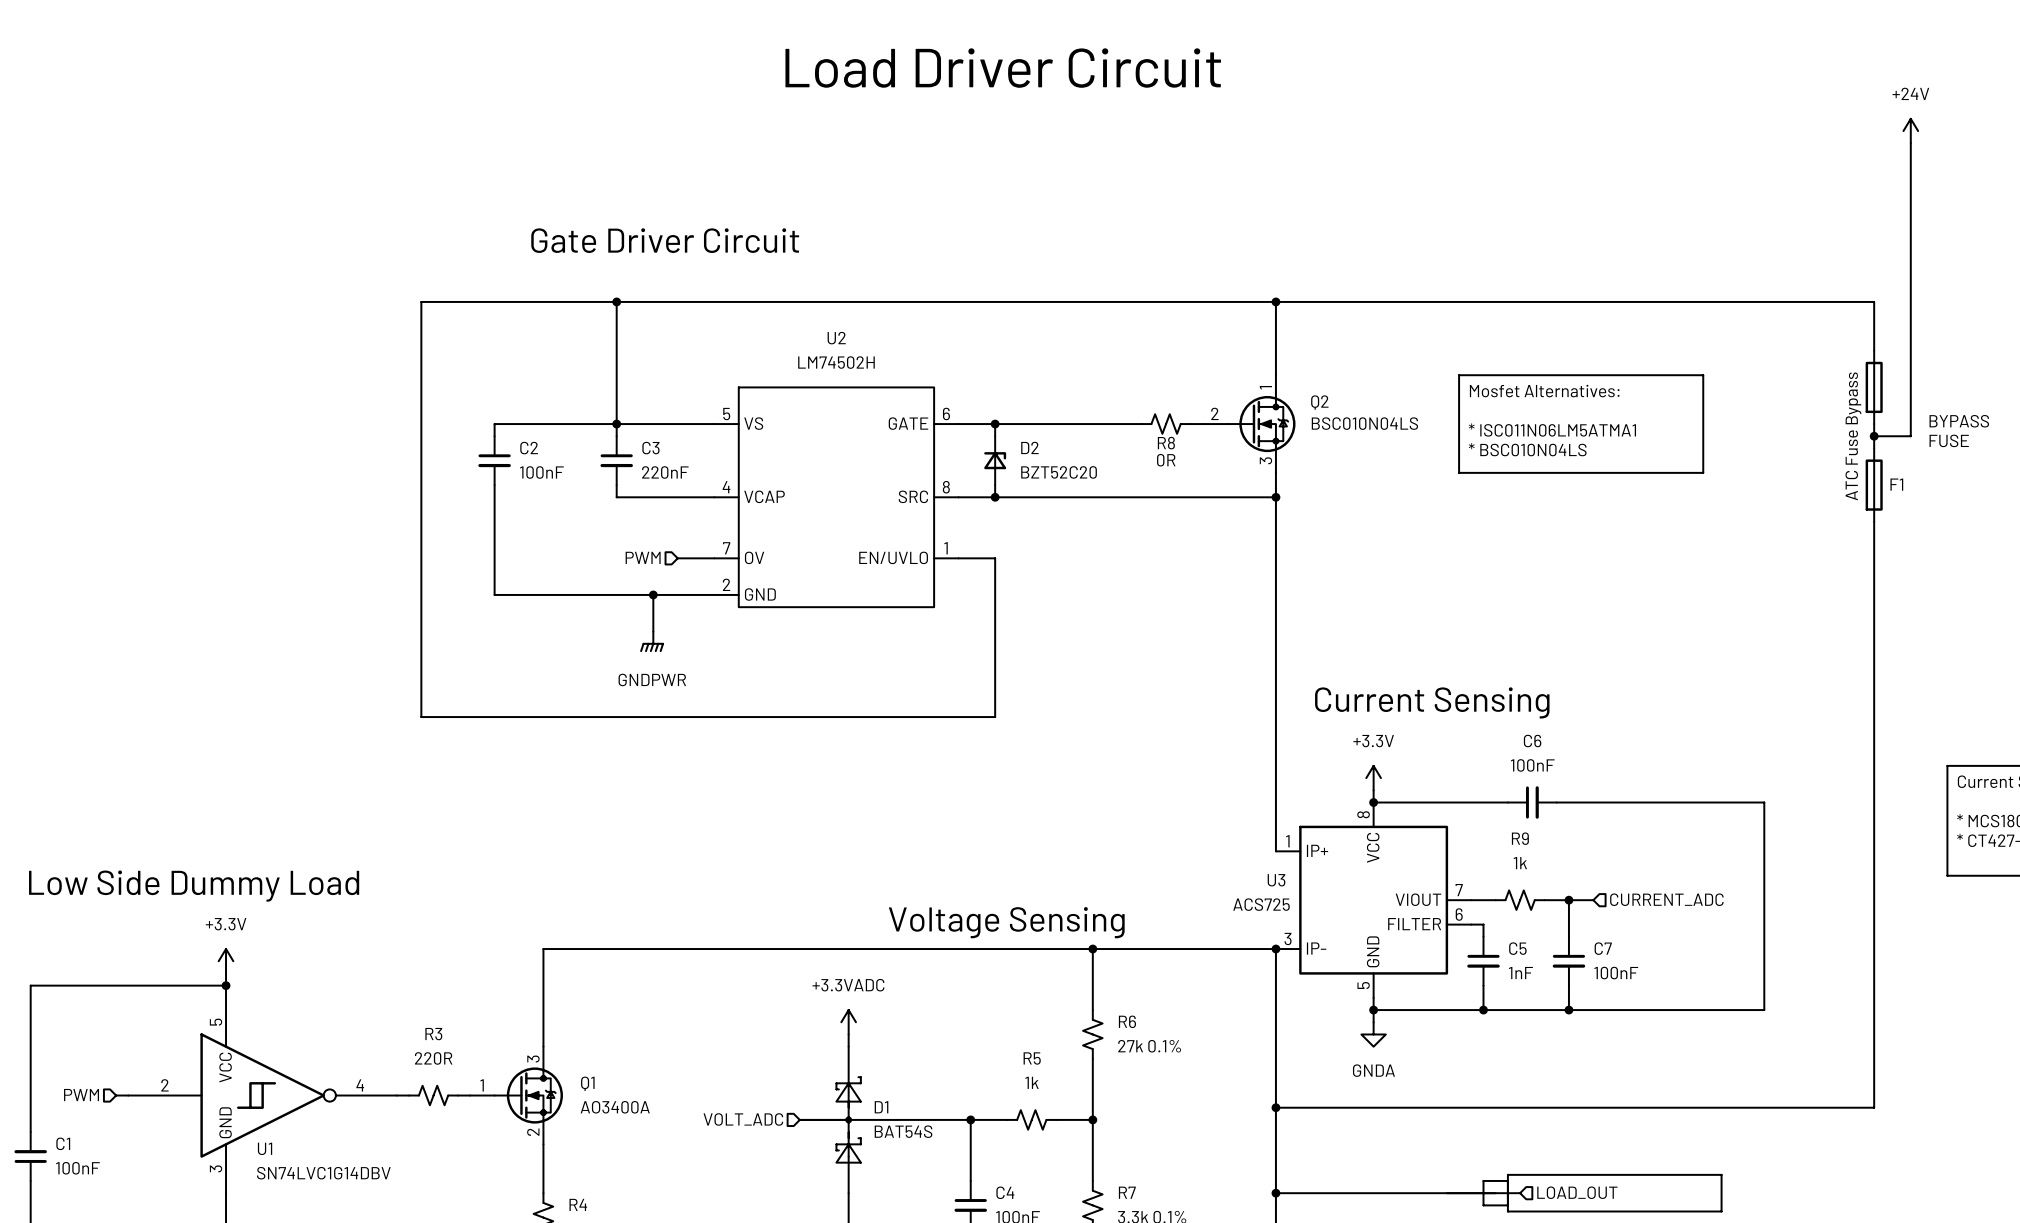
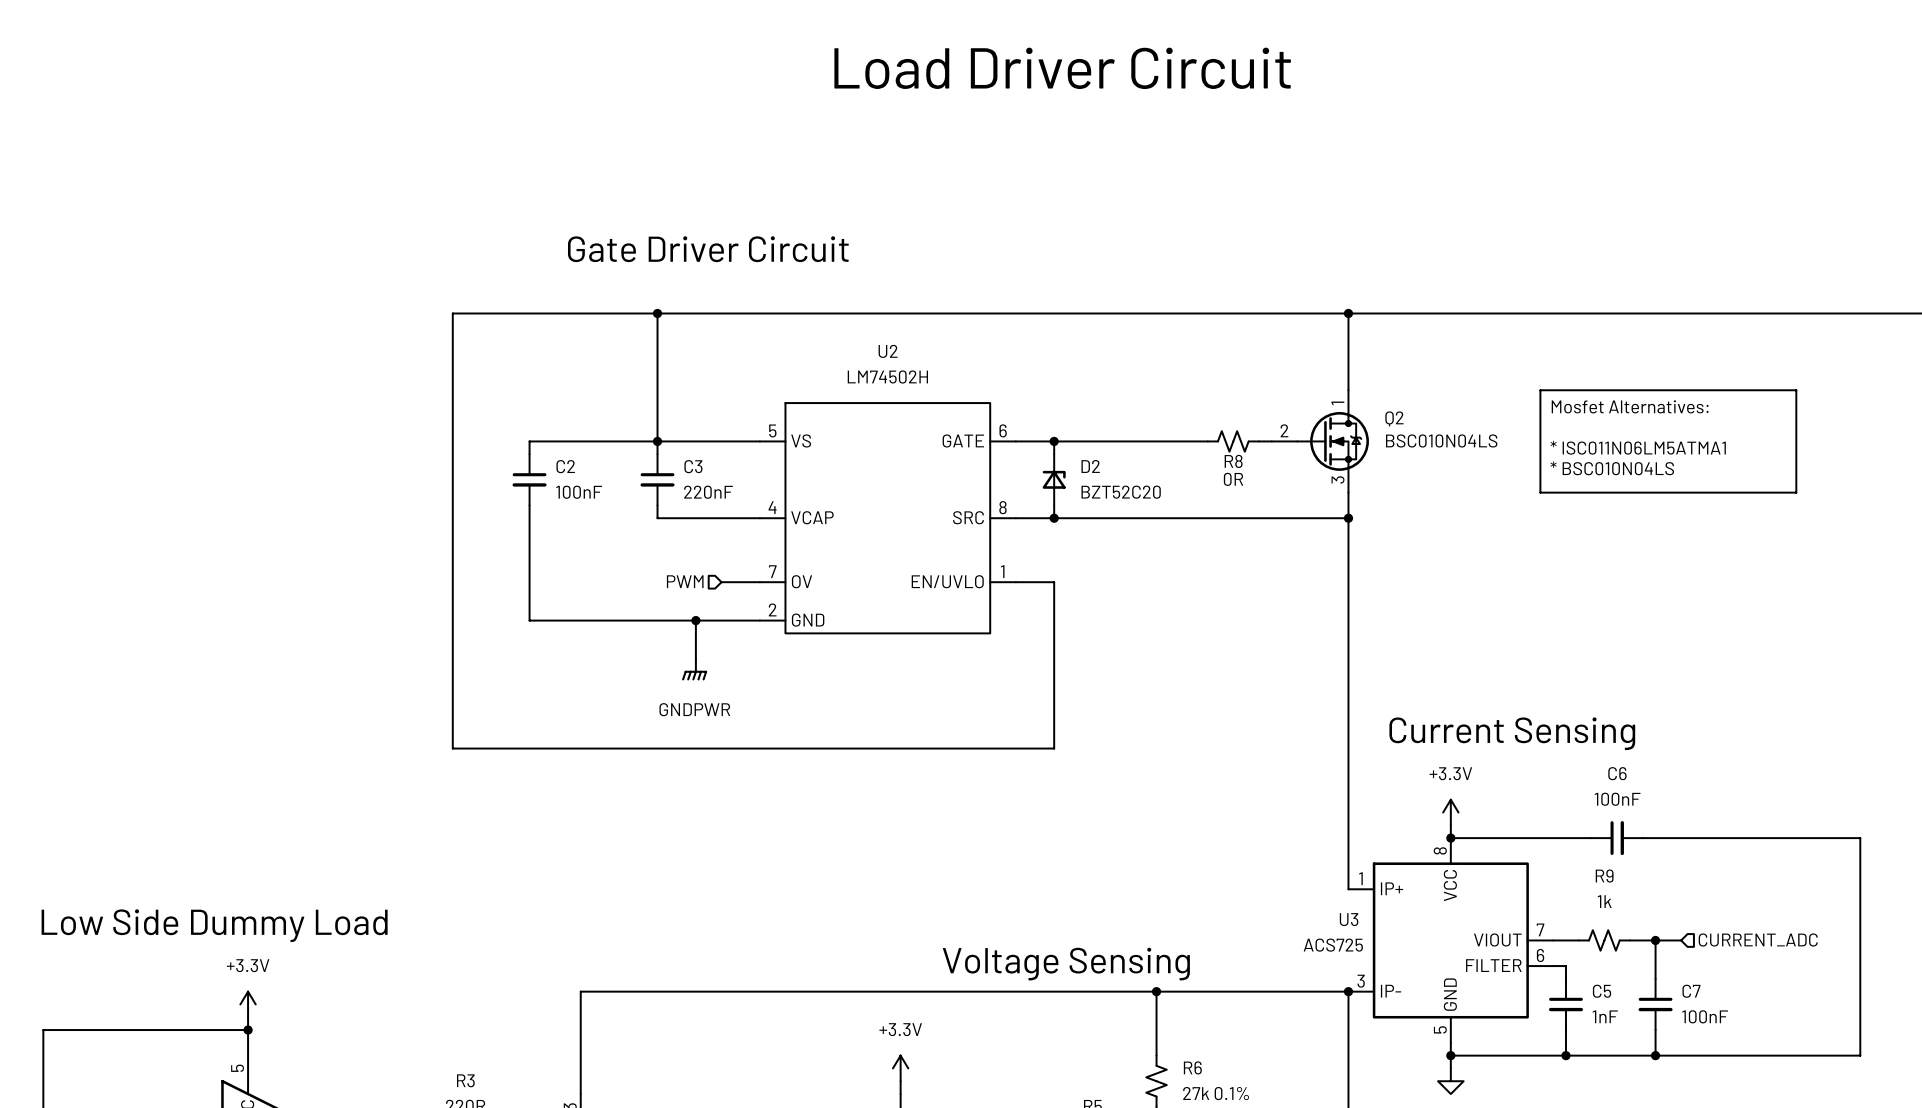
power symbol: +3.3VADC (848, 1022) -> +3.3V (900, 1068)

